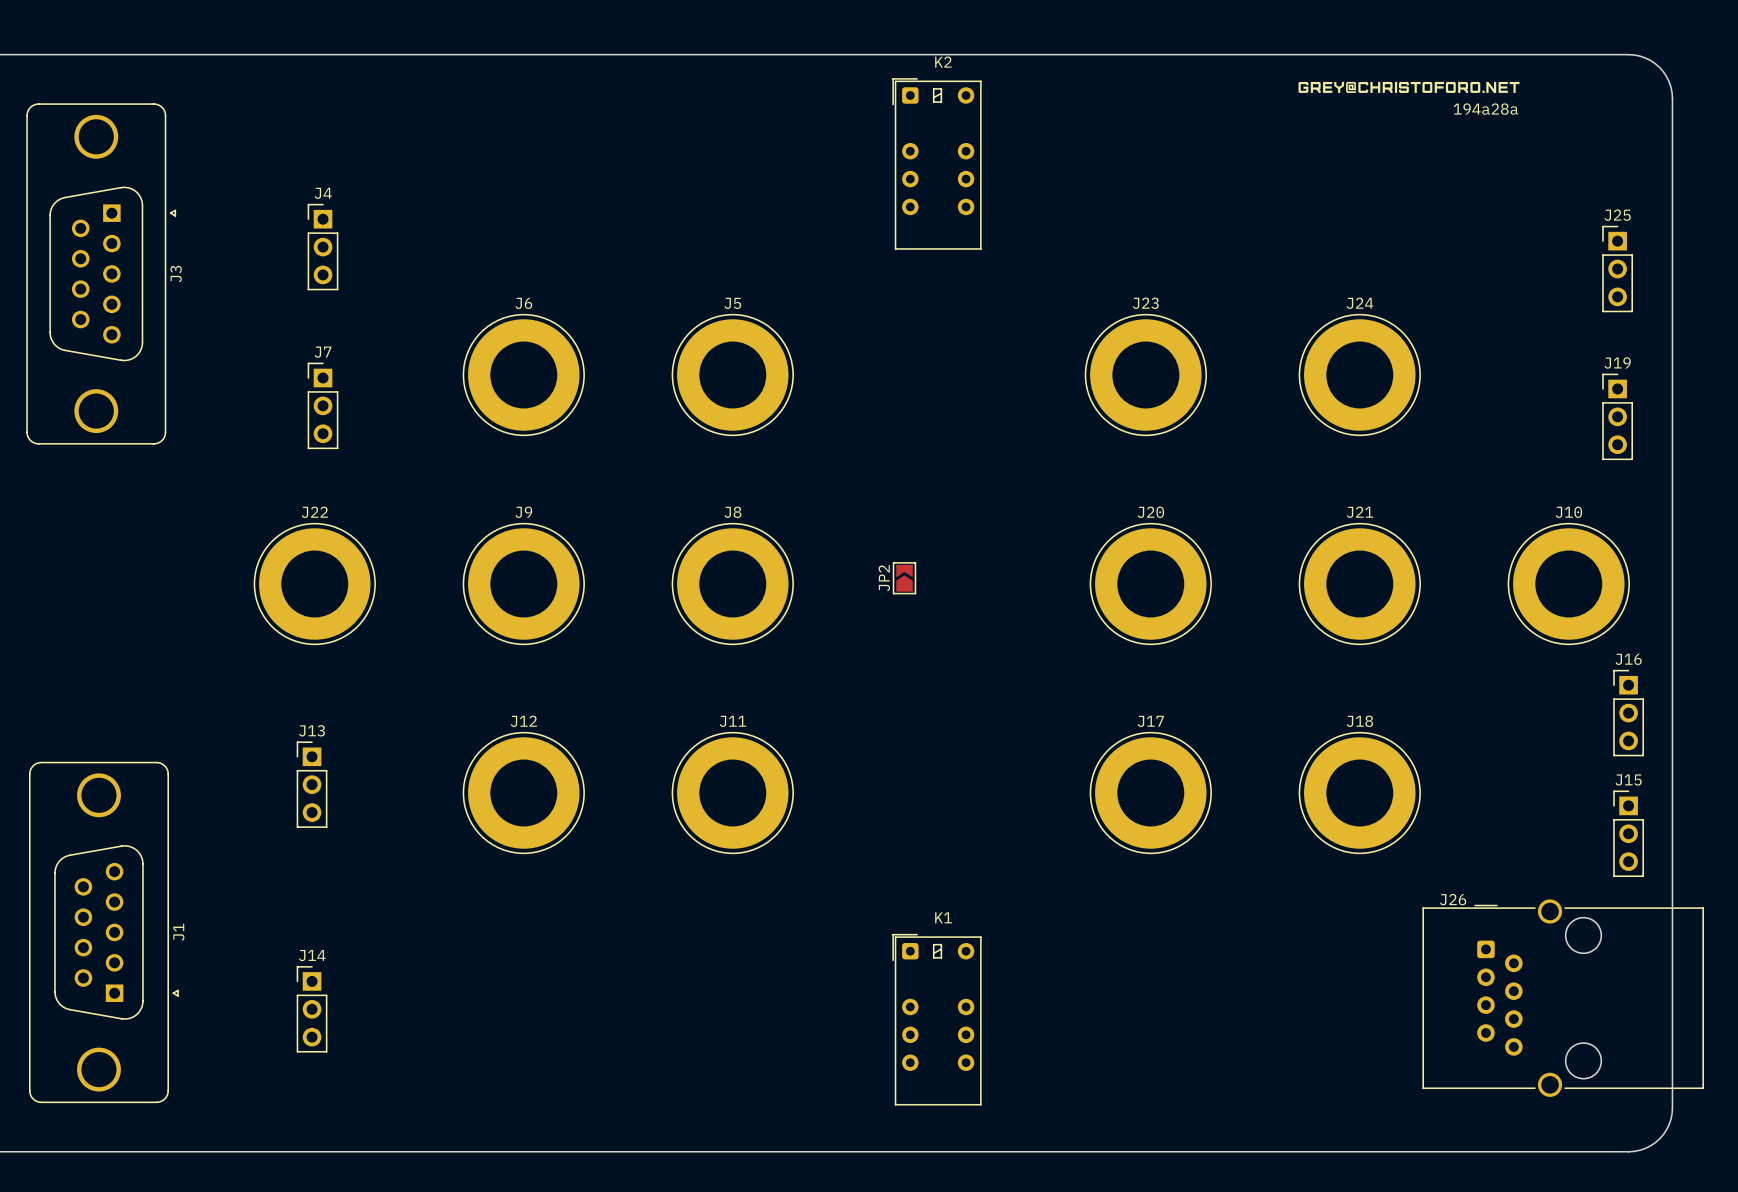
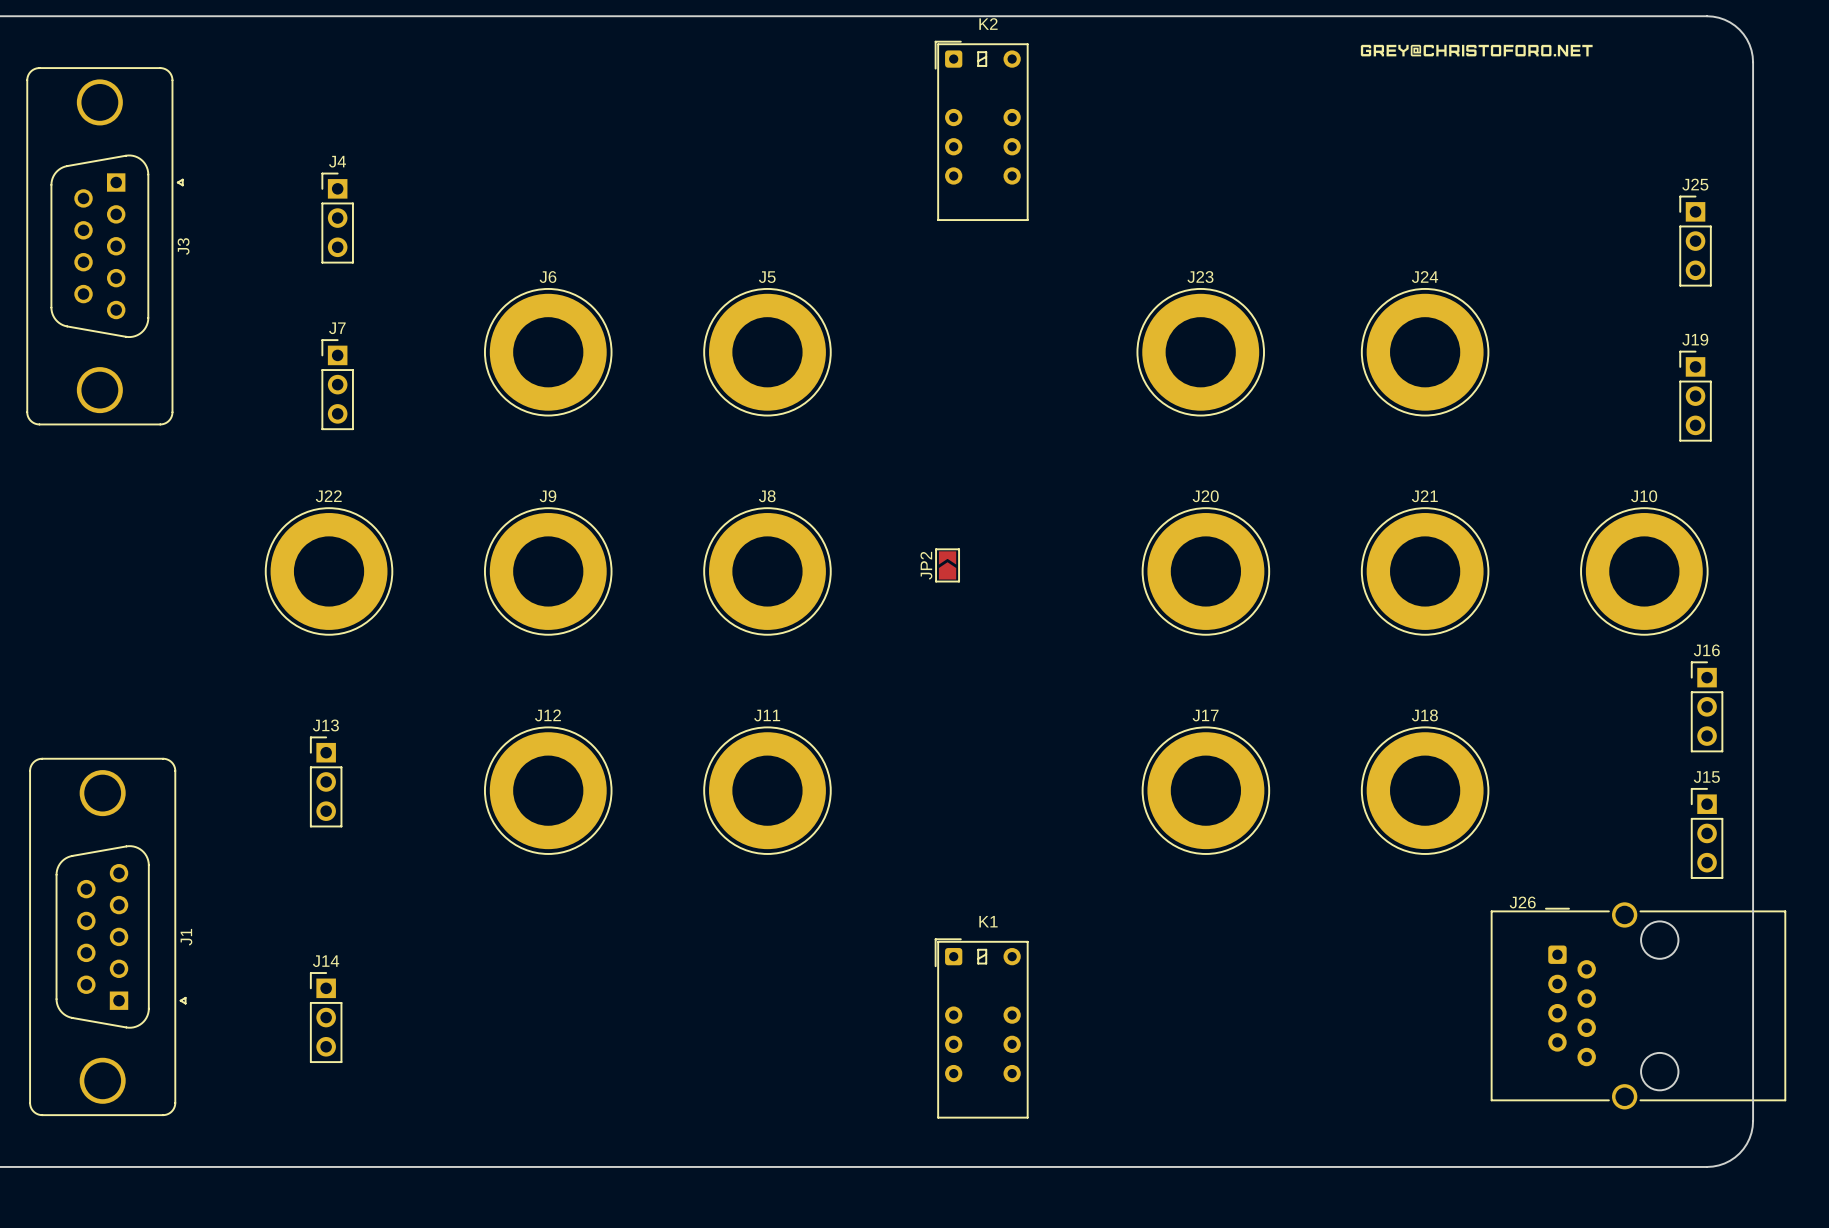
text: 194a28a (1485, 109) -> none

